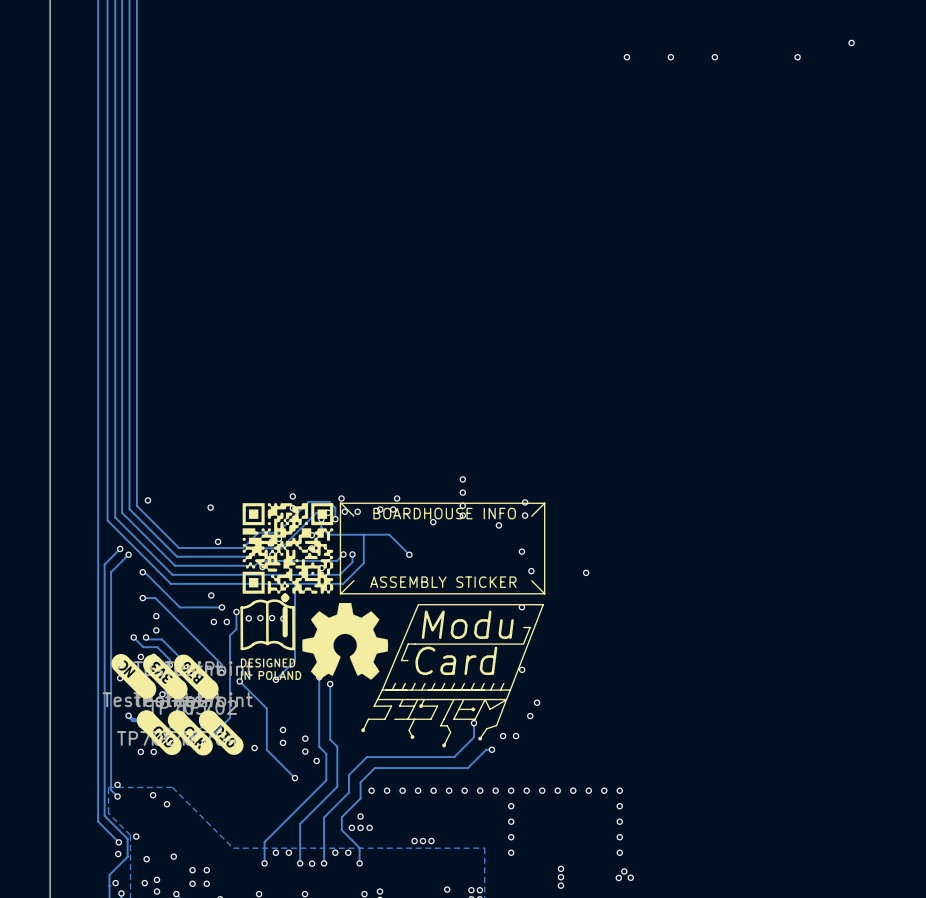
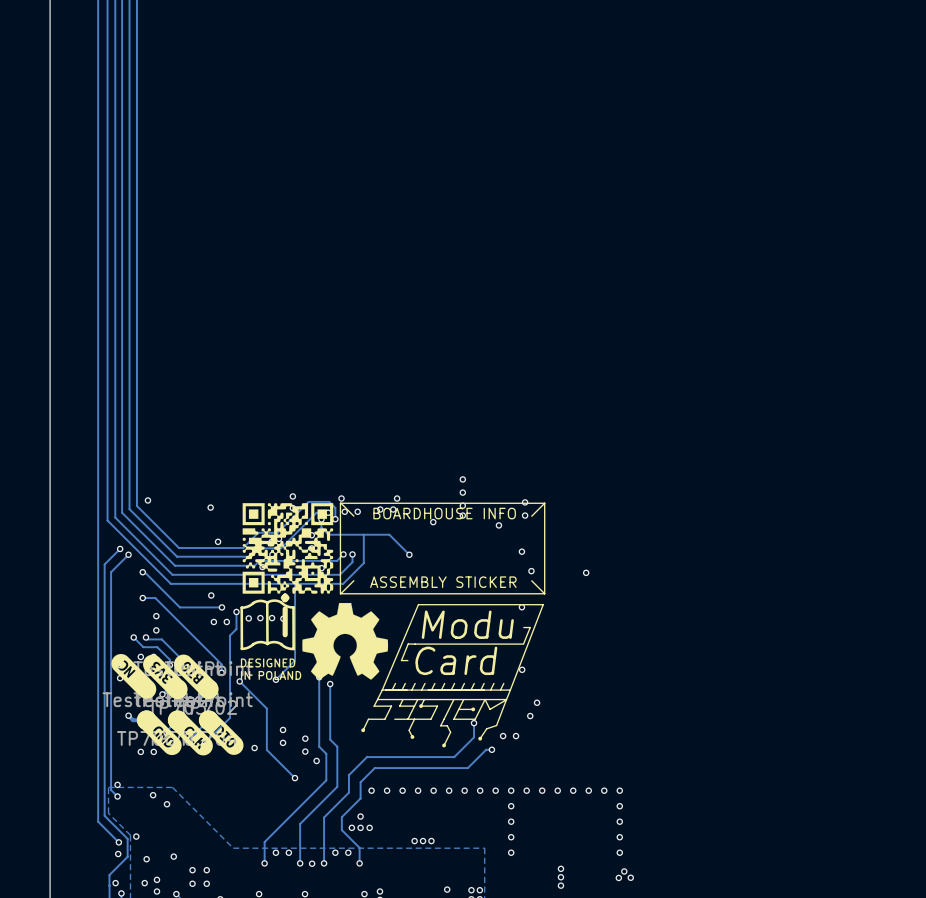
via: (851, 42) -> none
via: (626, 57) -> none
via: (670, 57) -> none
via: (714, 57) -> none
via: (797, 57) -> none

